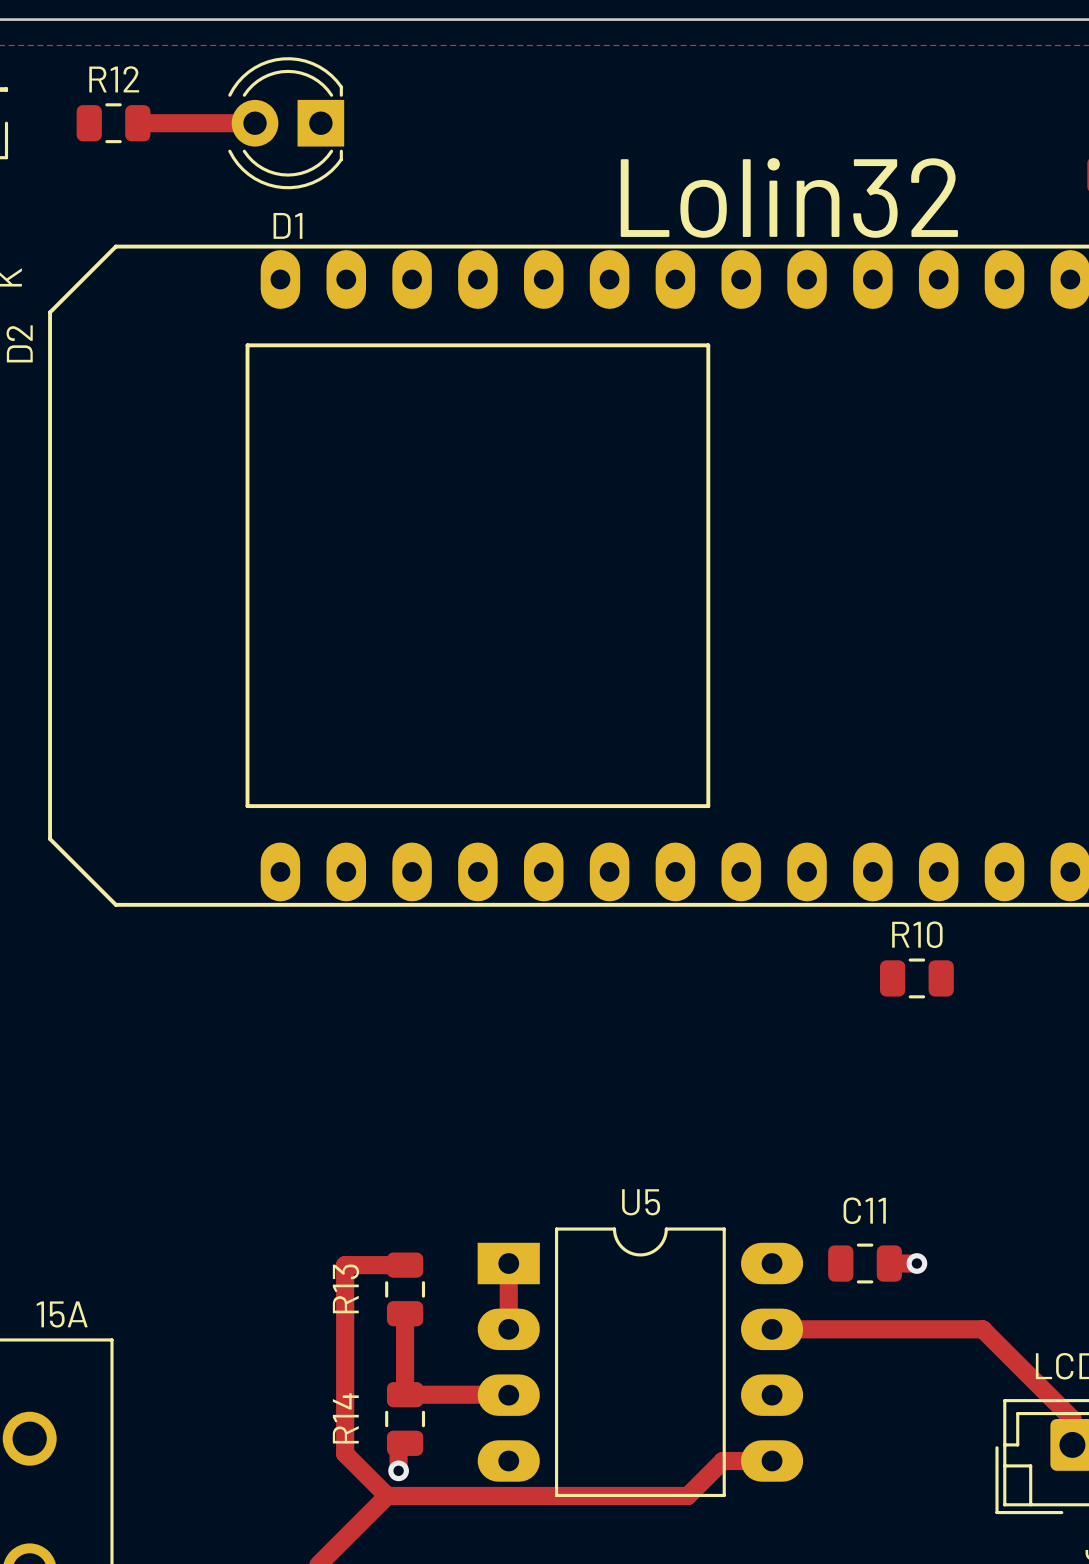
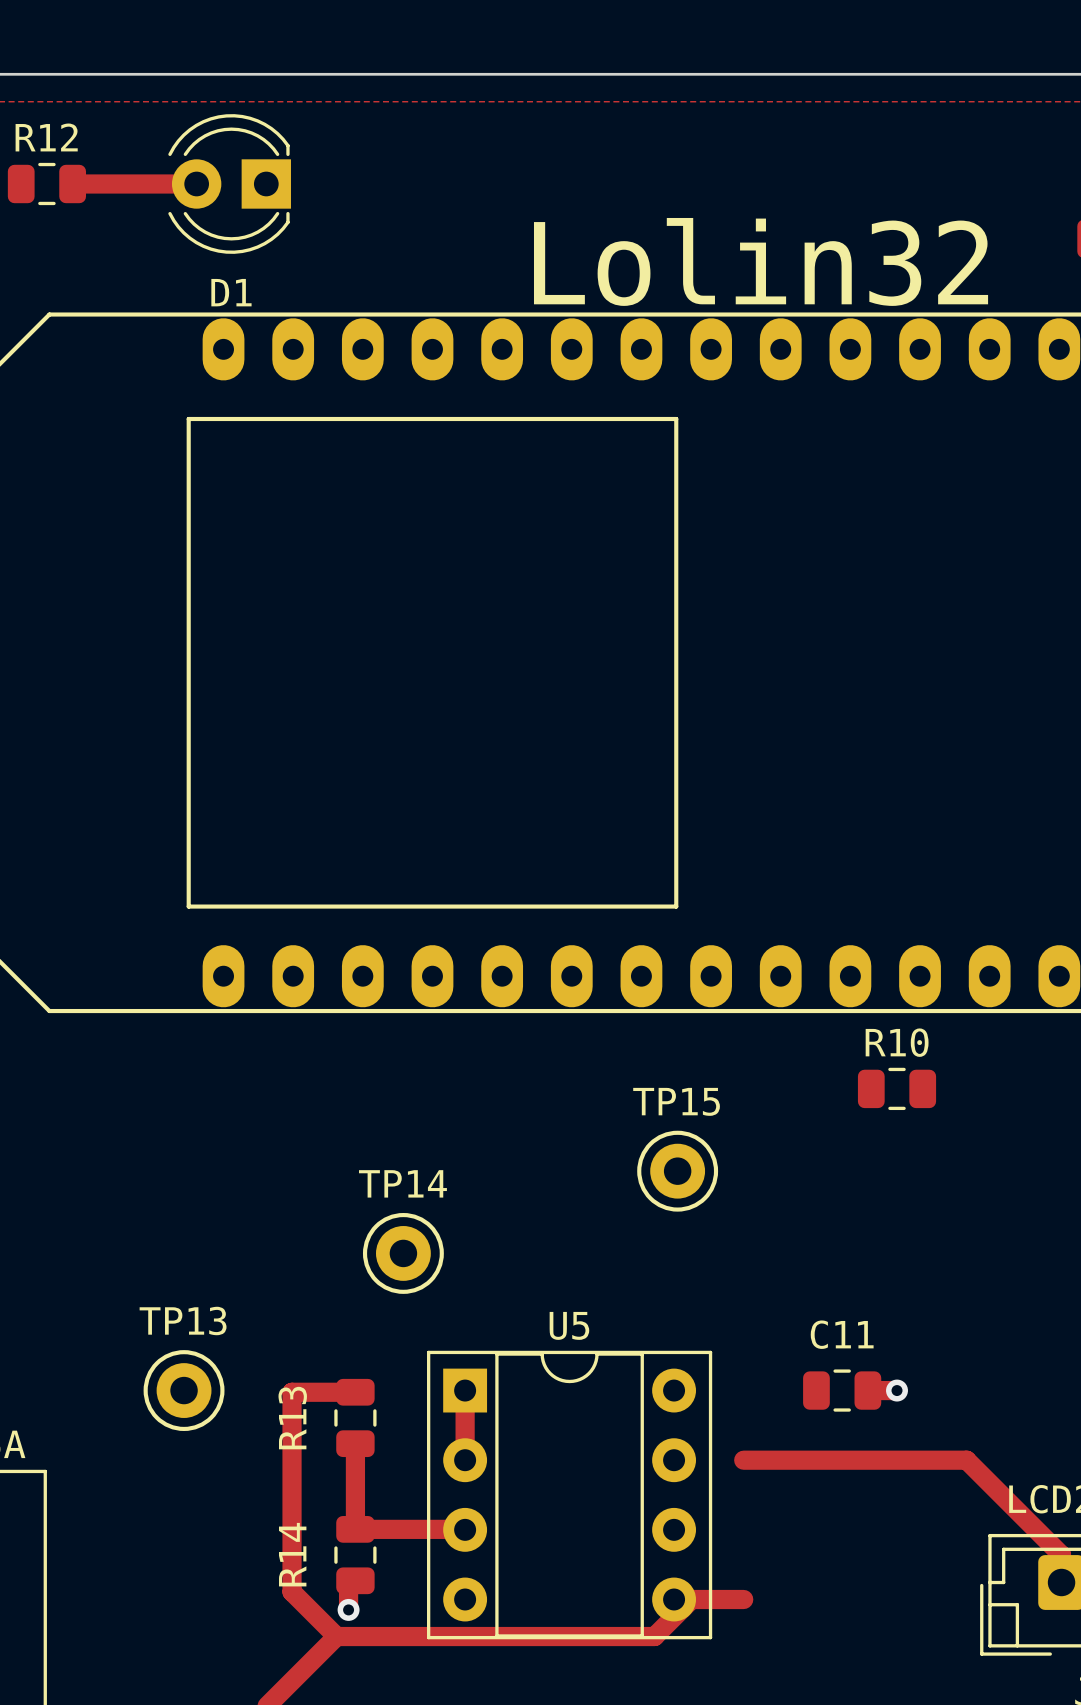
TP15: none -> (677, 1171)
TP14: none -> (403, 1253)
U5 footprint: [477, 1227, 804, 1498] -> [427, 1350, 713, 1640]
TP13: none -> (184, 1390)

